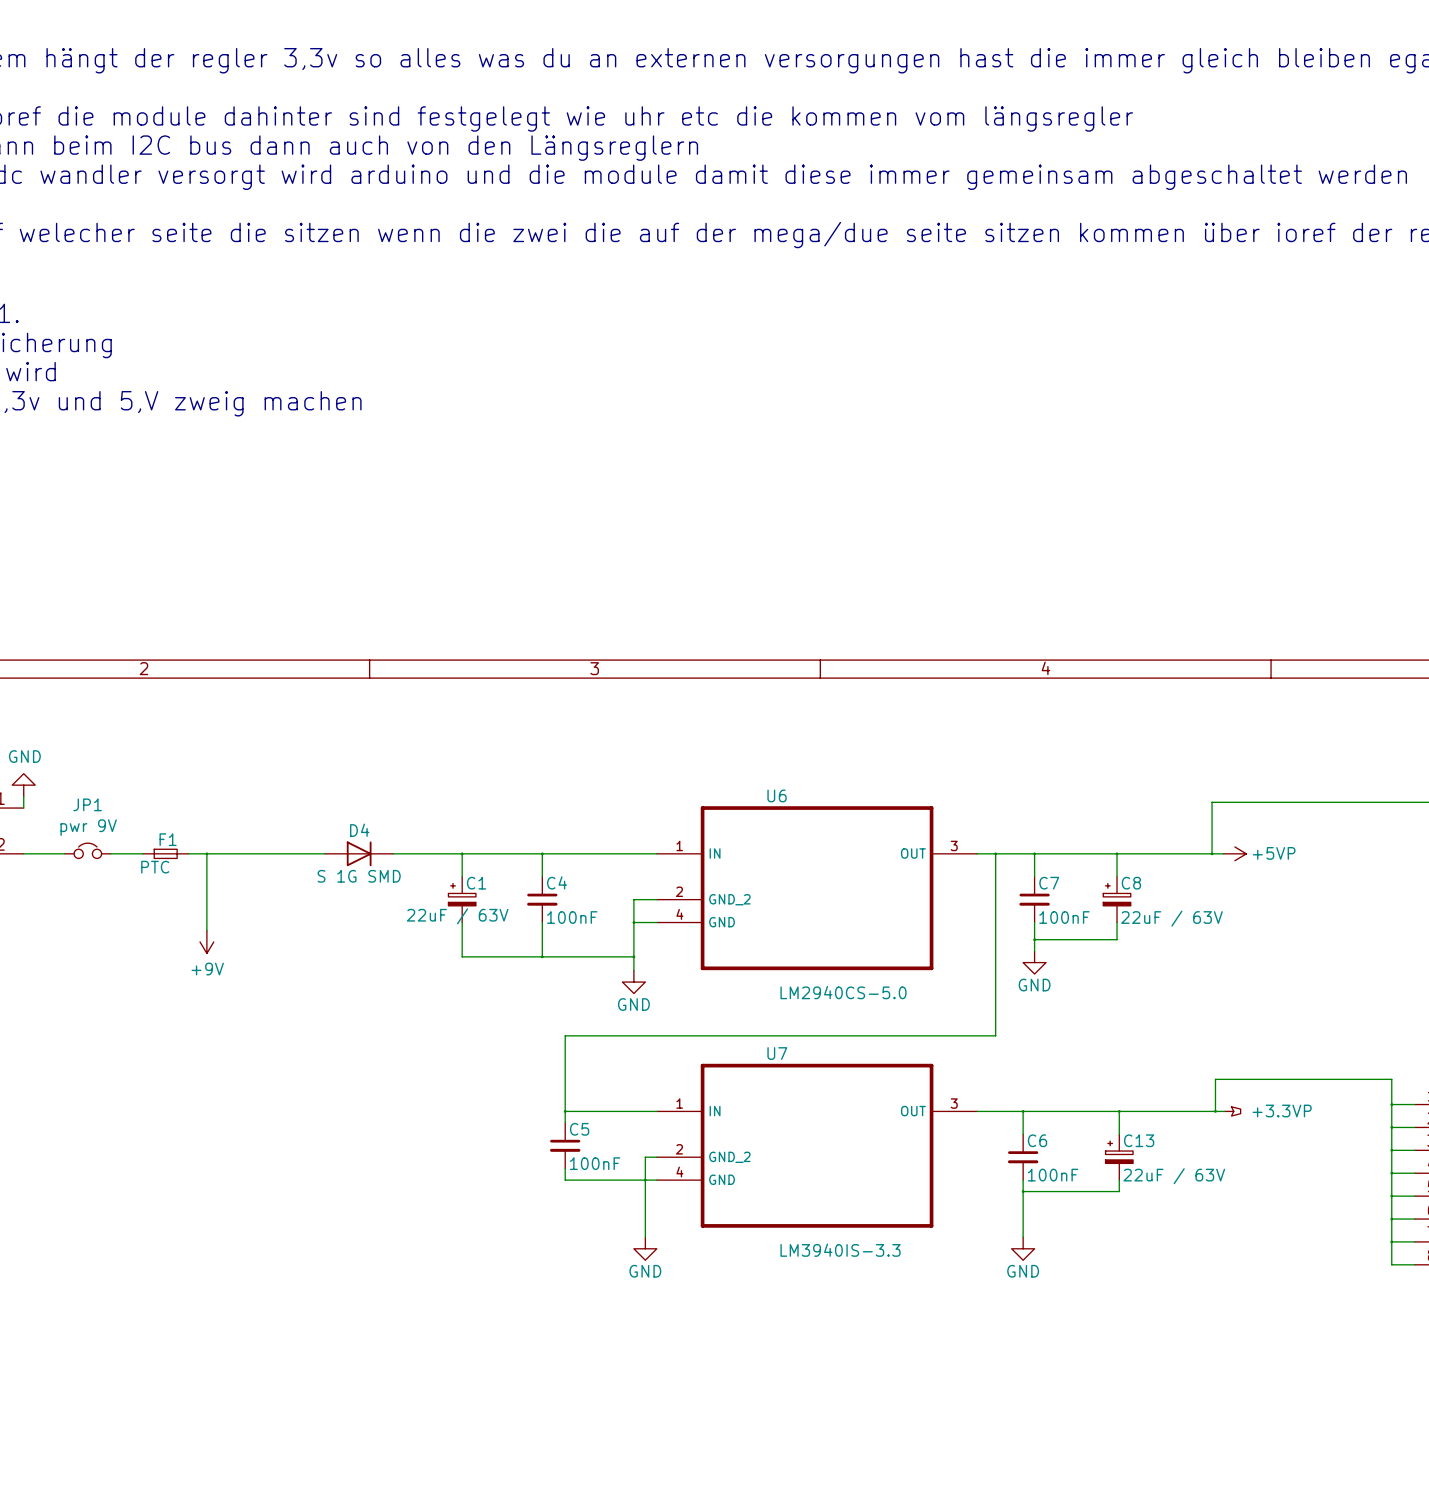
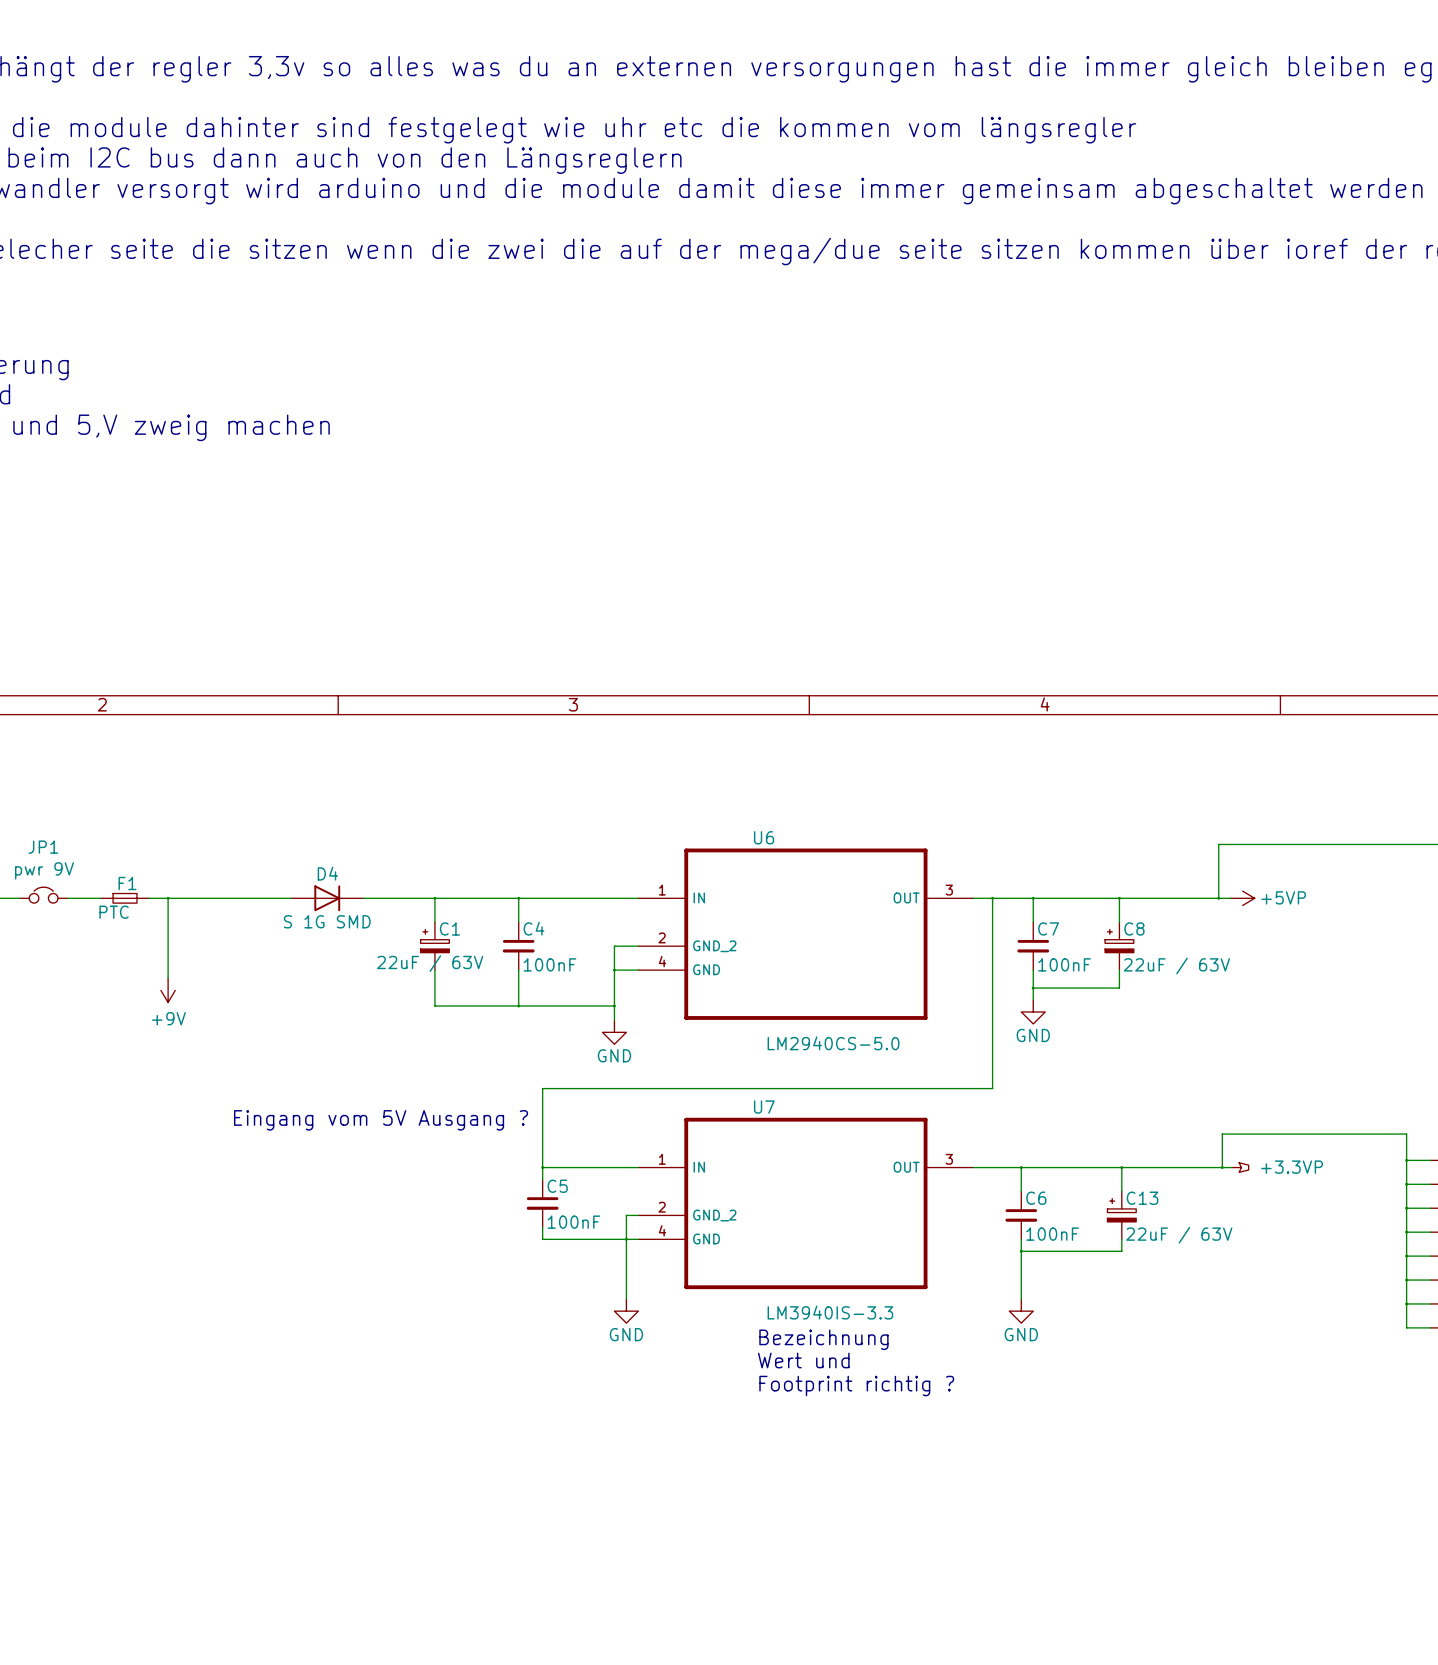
text: none -> Eingang vom 5V Ausgang ? (381, 1120)
text: none -> Bezeichnung (823, 1339)
text: none -> Wert und (803, 1360)
text: none -> Footprint richtig ? (856, 1386)

